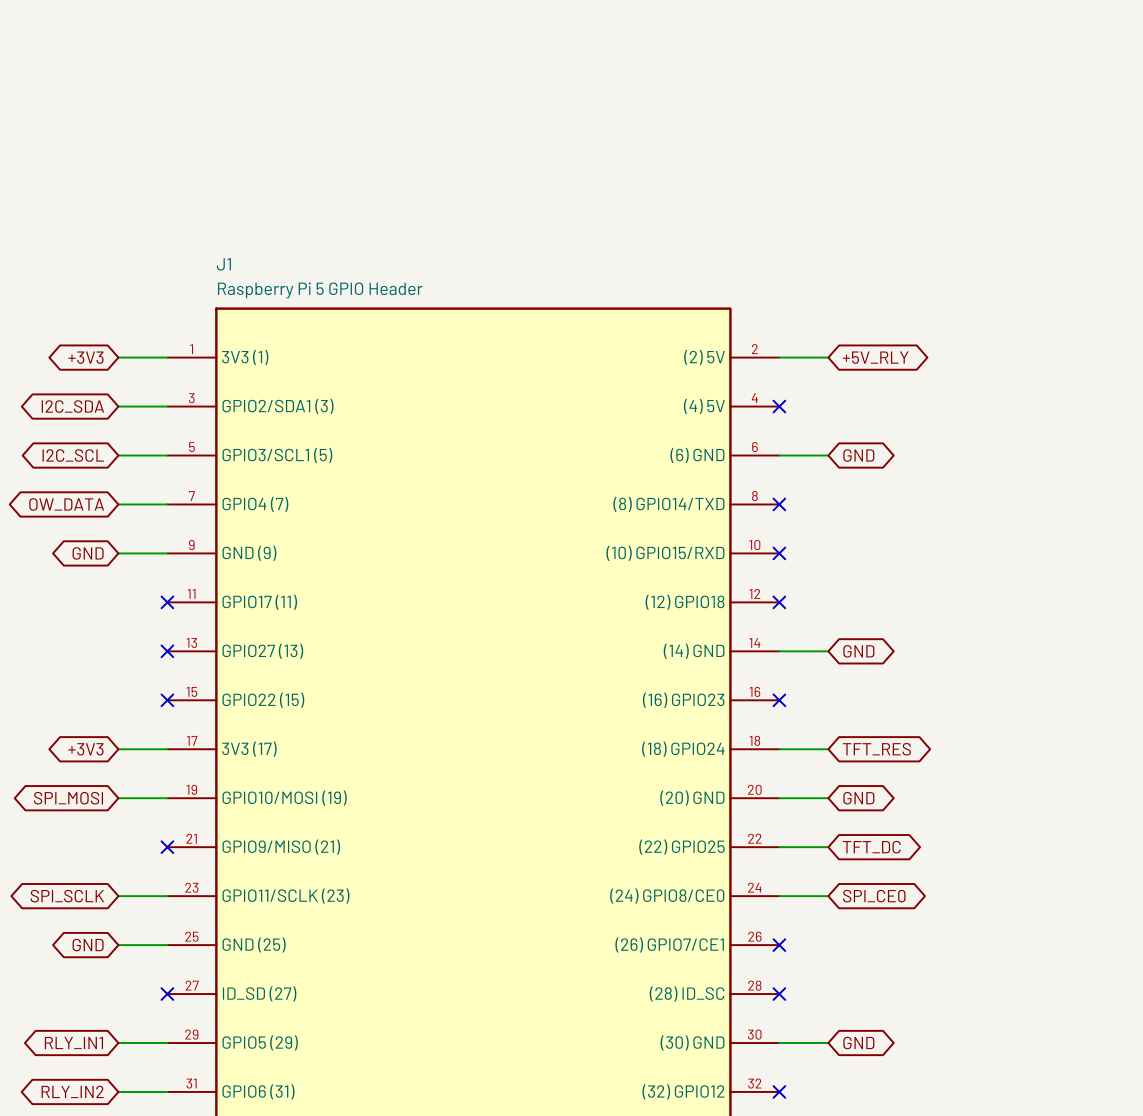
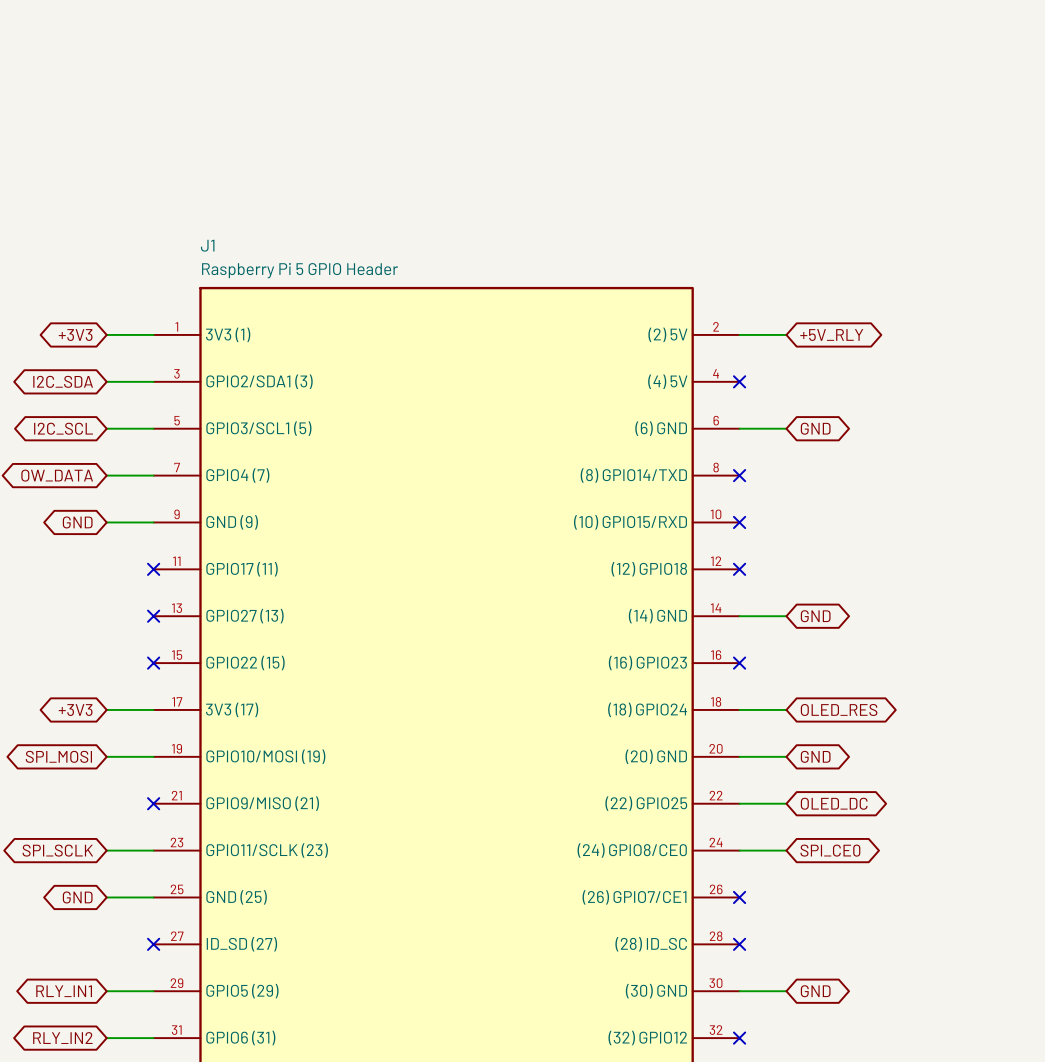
global label: TFT_RES (876, 749) -> OLED_RES (839, 709)
global label: TFT_DC (871, 847) -> OLED_DC (834, 803)

